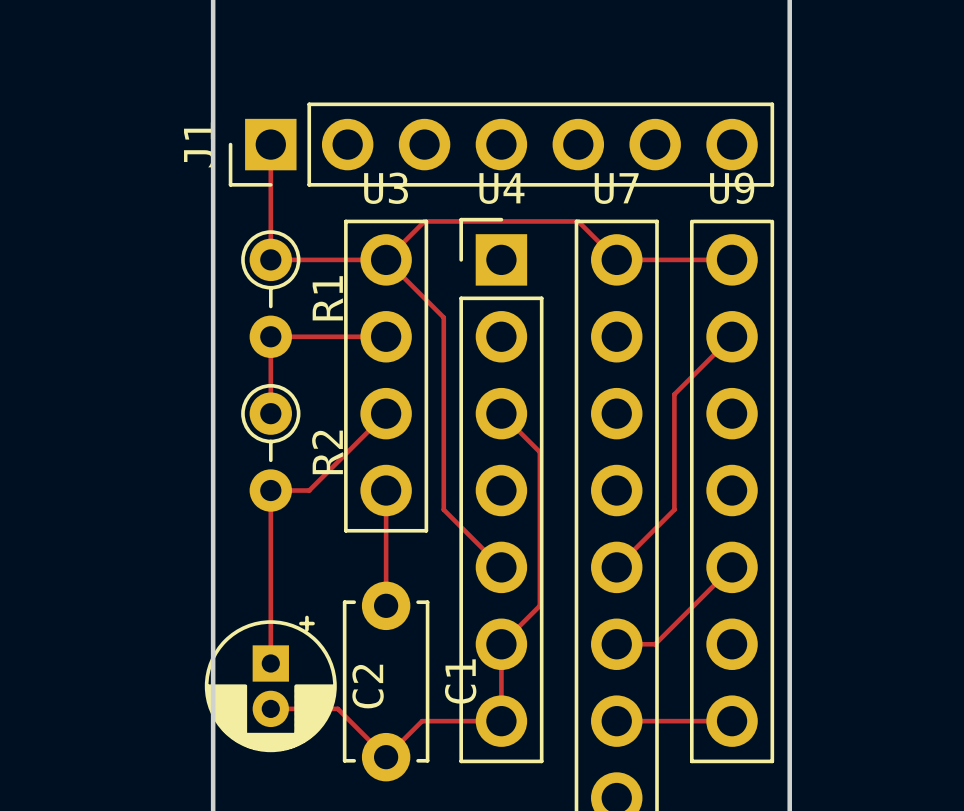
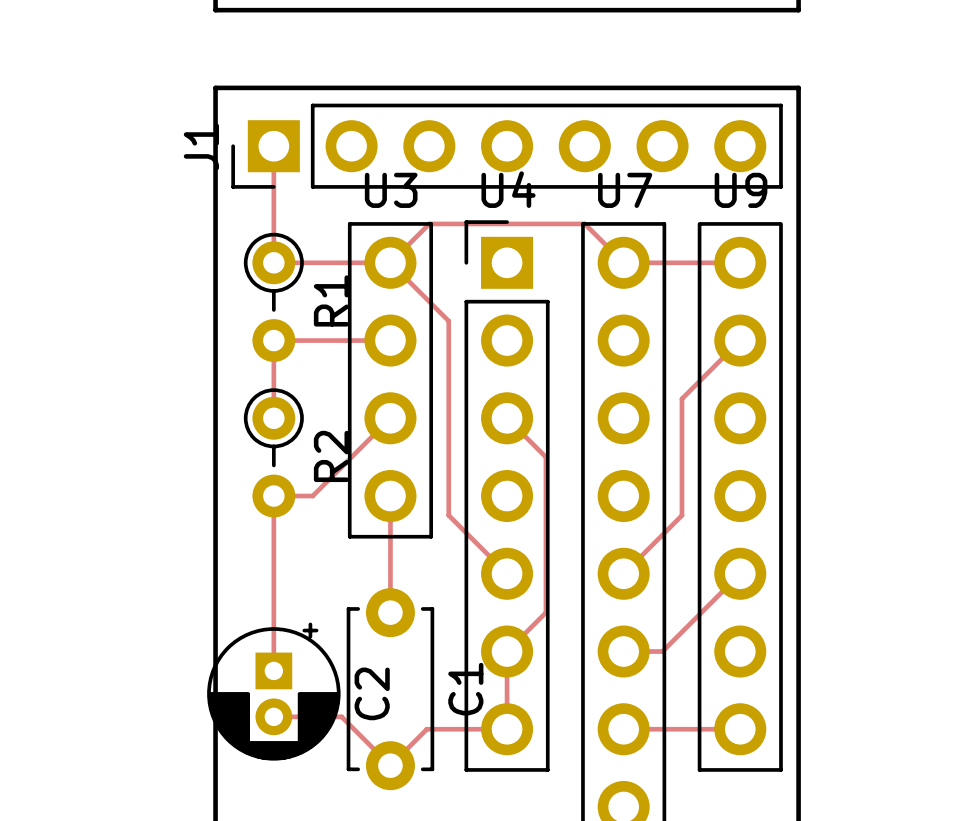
board edge: (213, 10) (213, 86) -> (215, 10) (798, 10)
board edge: (789, 10) (789, 86) -> (215, 87) (798, 87)

